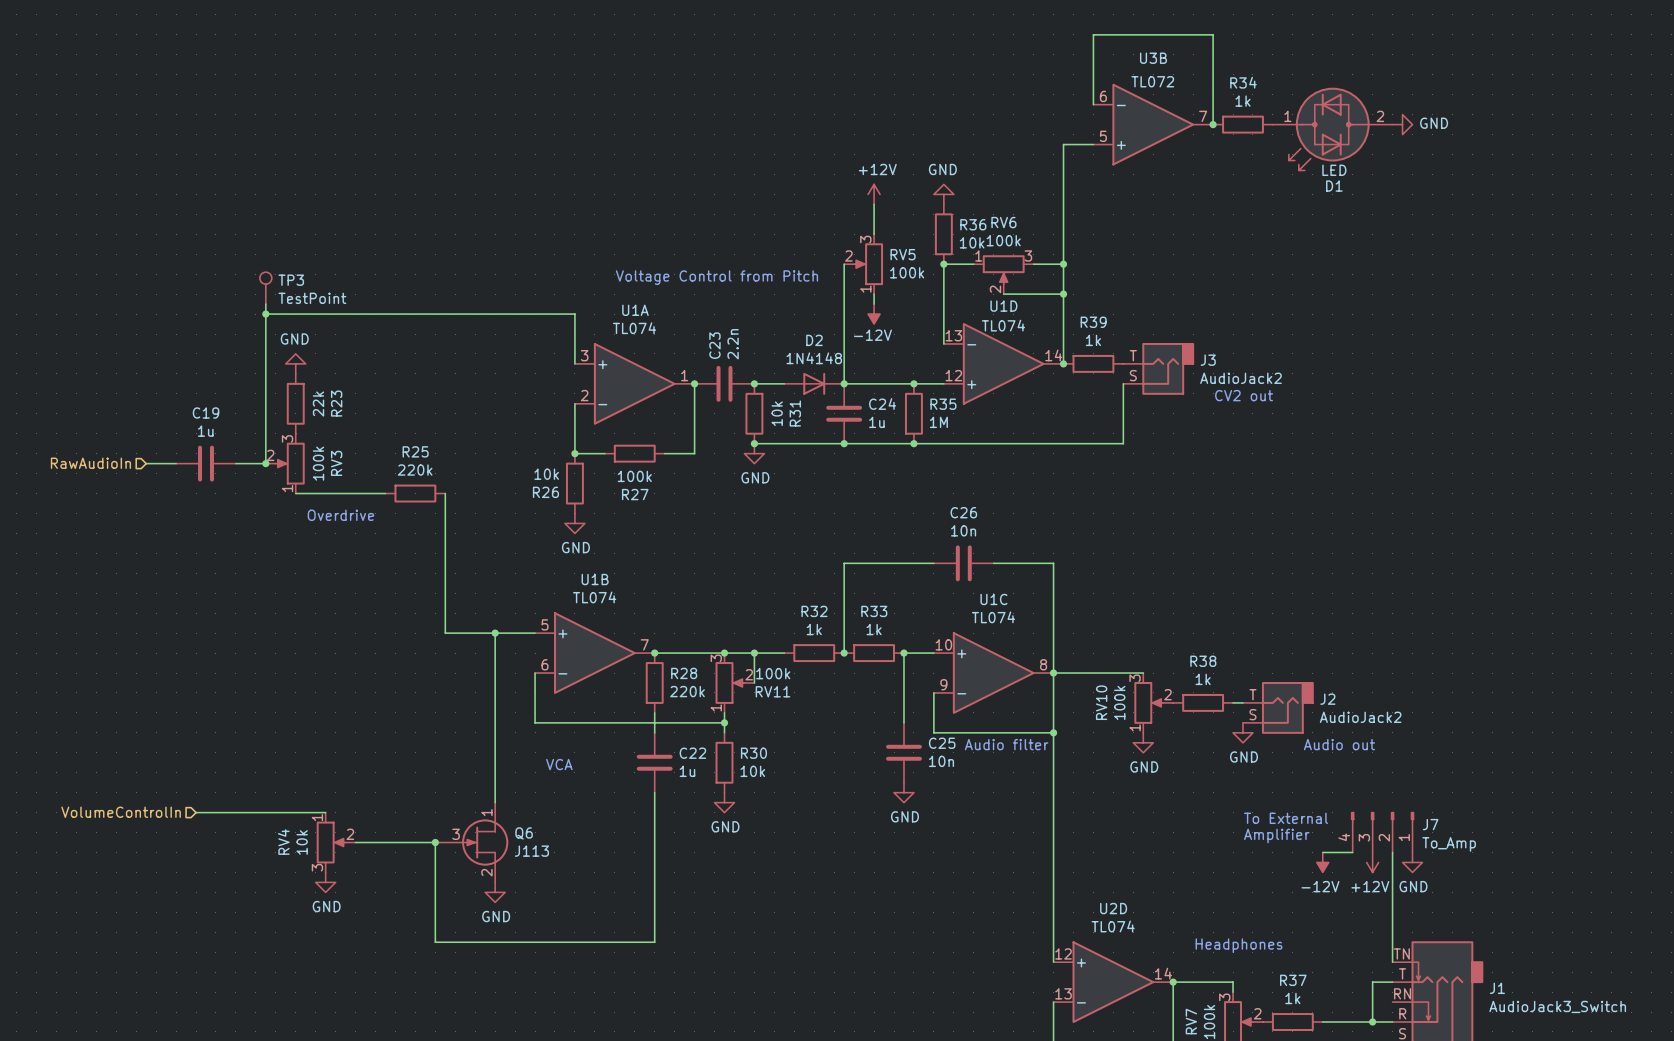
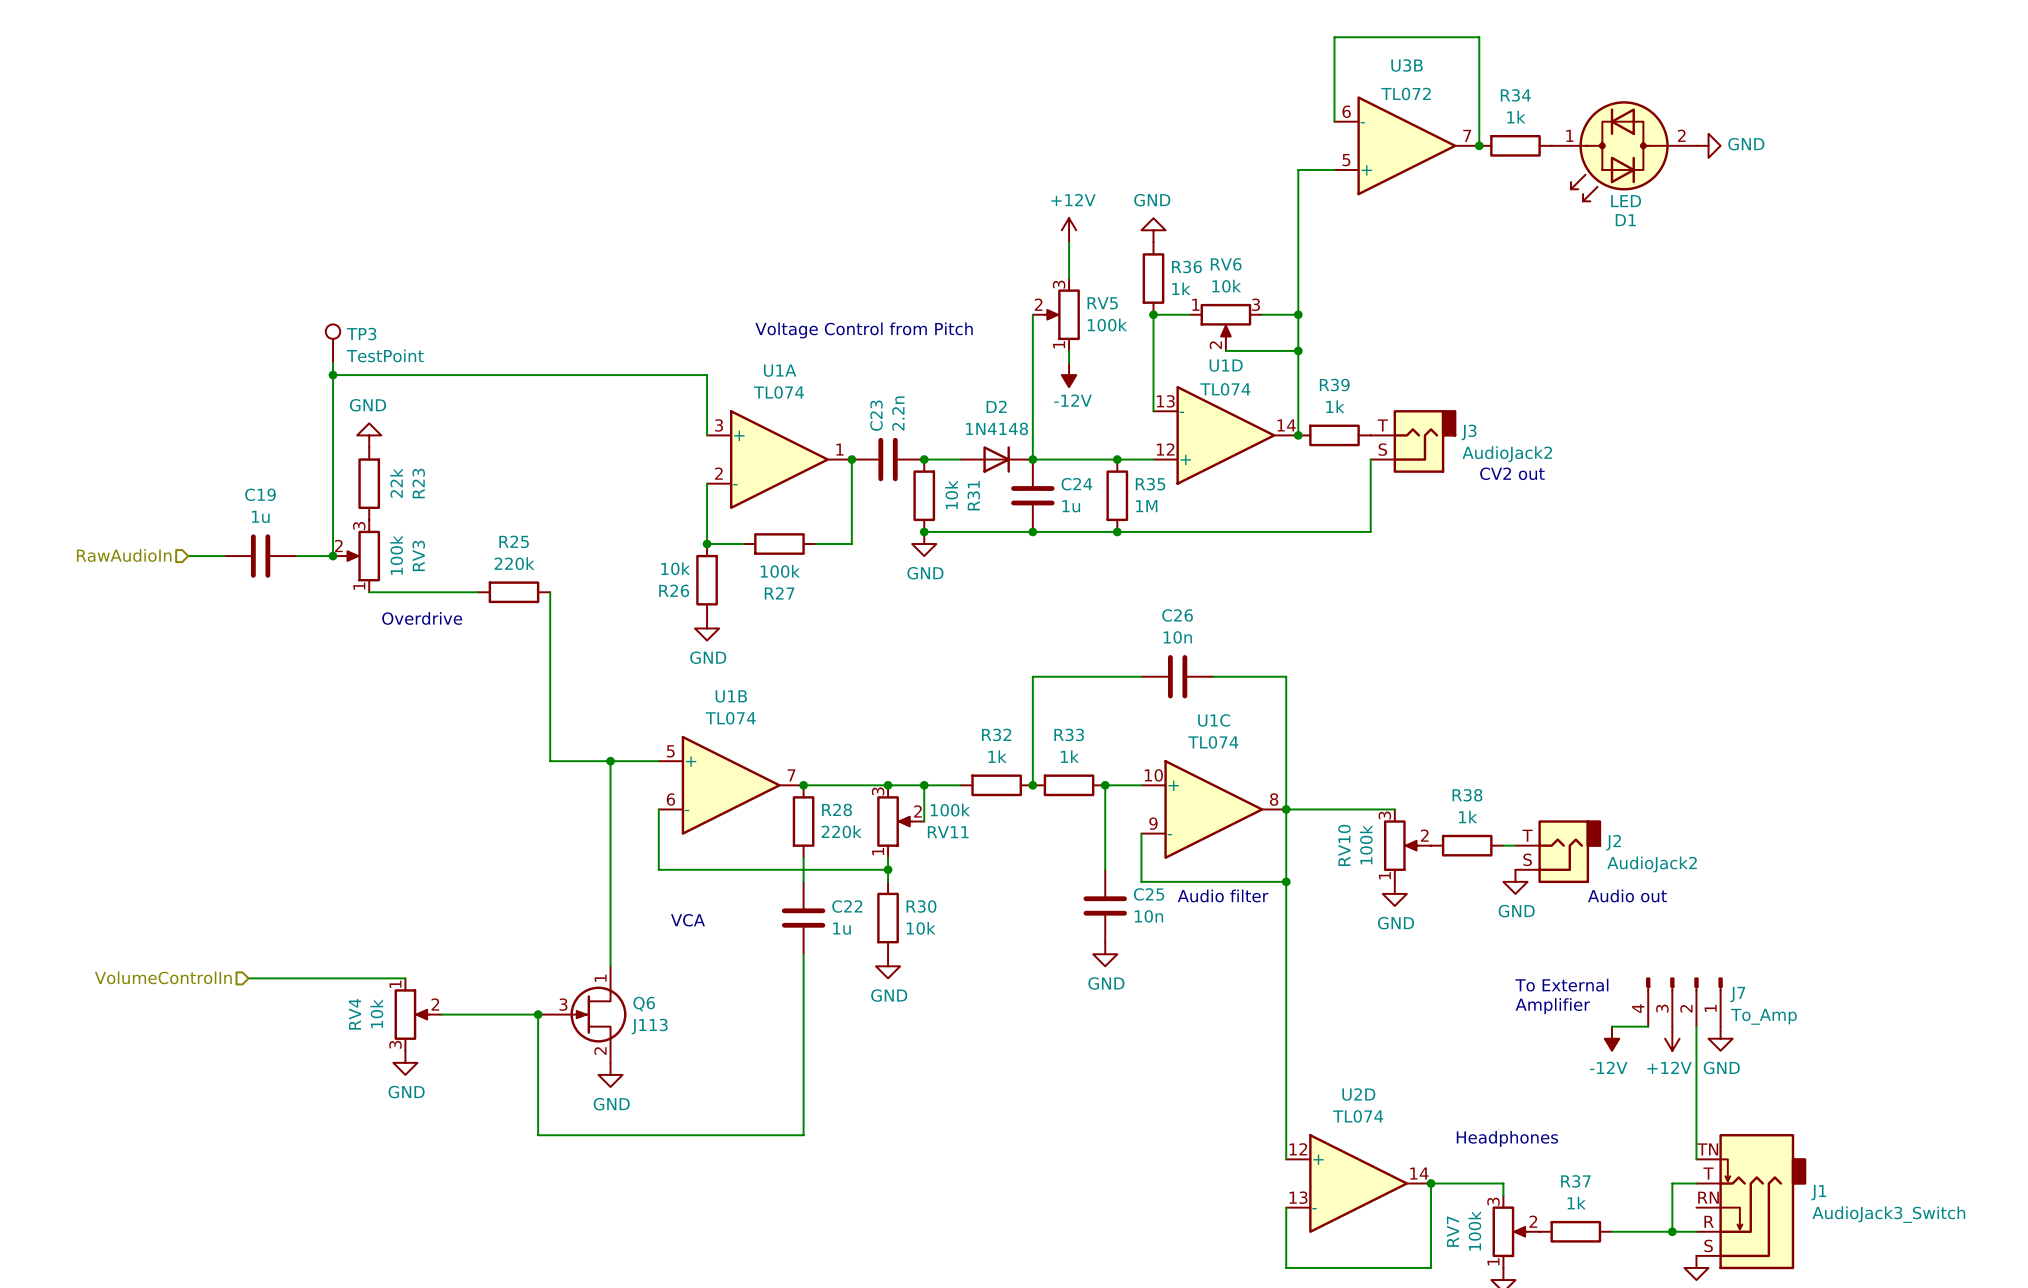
RV6 value: 100k (1003, 240) -> 10k (1226, 286)
R36 value: 10k (972, 242) -> 1k (1181, 288)

